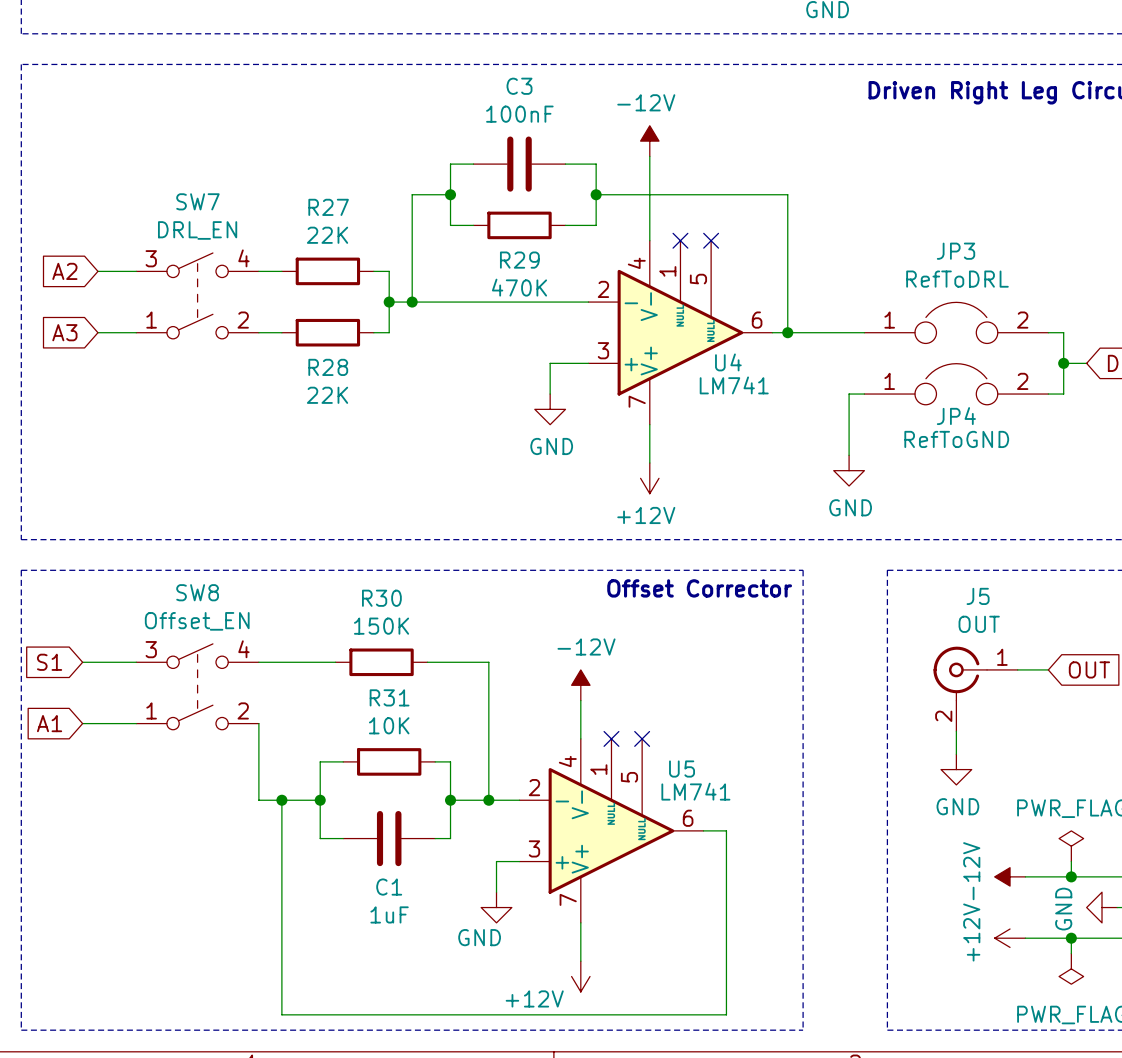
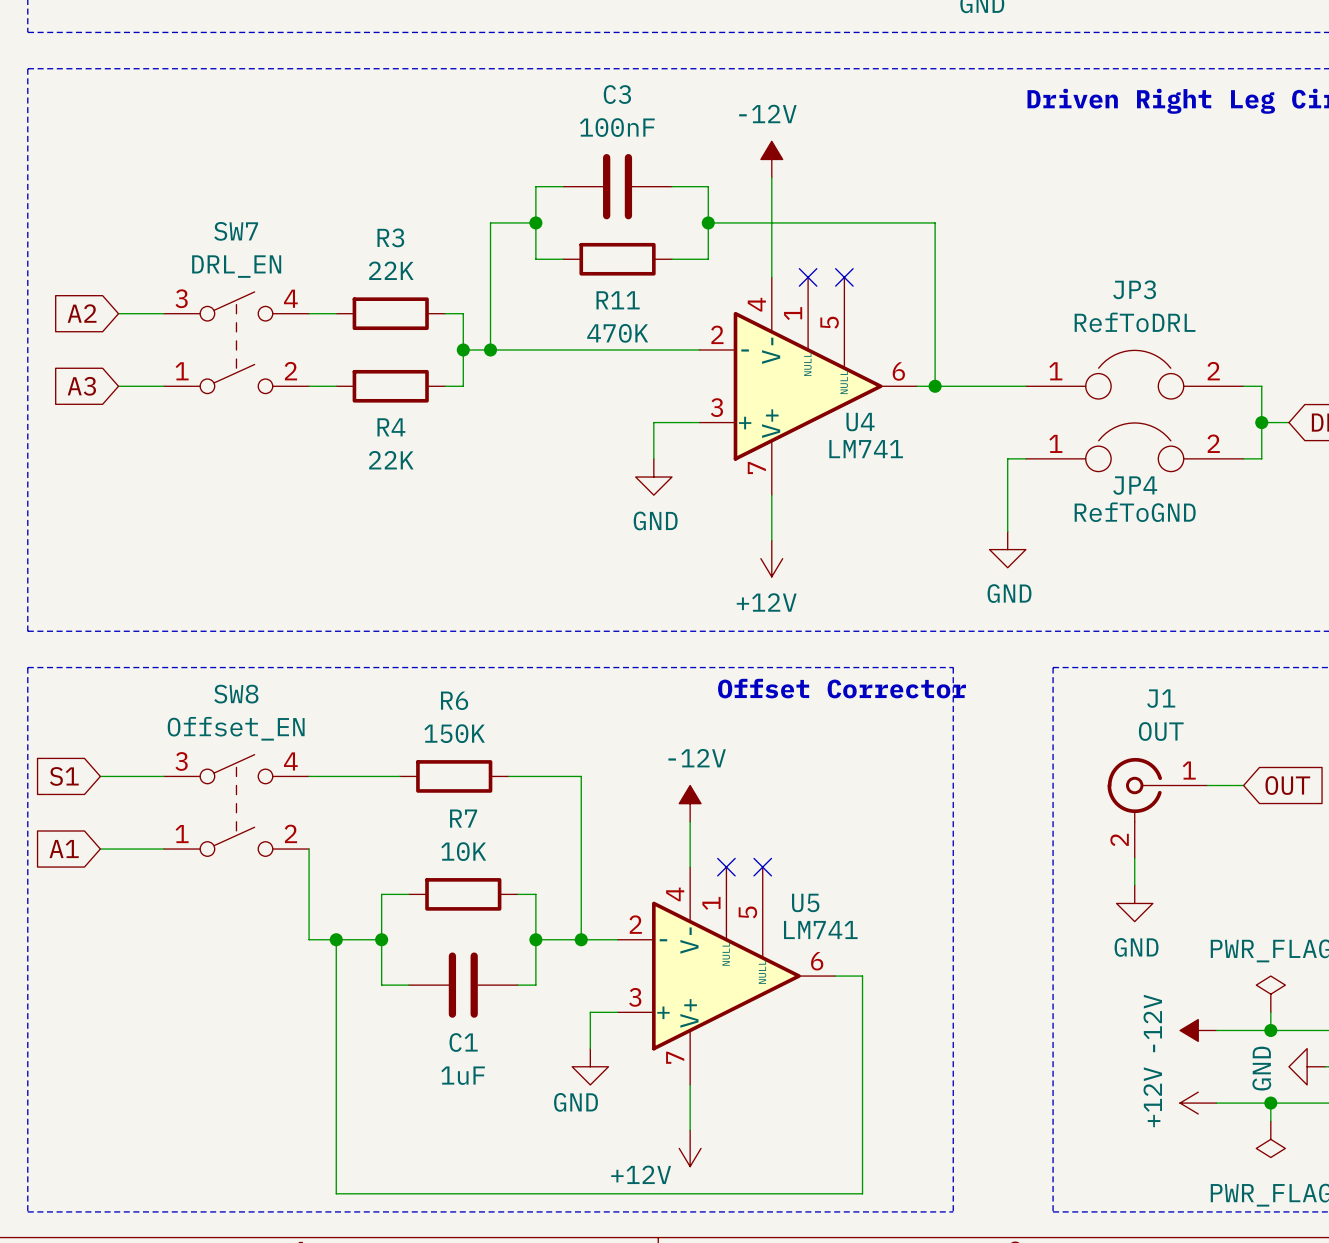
R27 name: R27 (328, 207) -> R3 (390, 237)
R29 name: R29 (519, 260) -> R11 (618, 300)
R28 name: R28 (328, 367) -> R4 (391, 427)
J5 name: J5 (978, 596) -> J1 (1161, 698)
R30 name: R30 (381, 598) -> R6 (454, 700)
R31 name: R31 (389, 697) -> R7 (463, 818)

